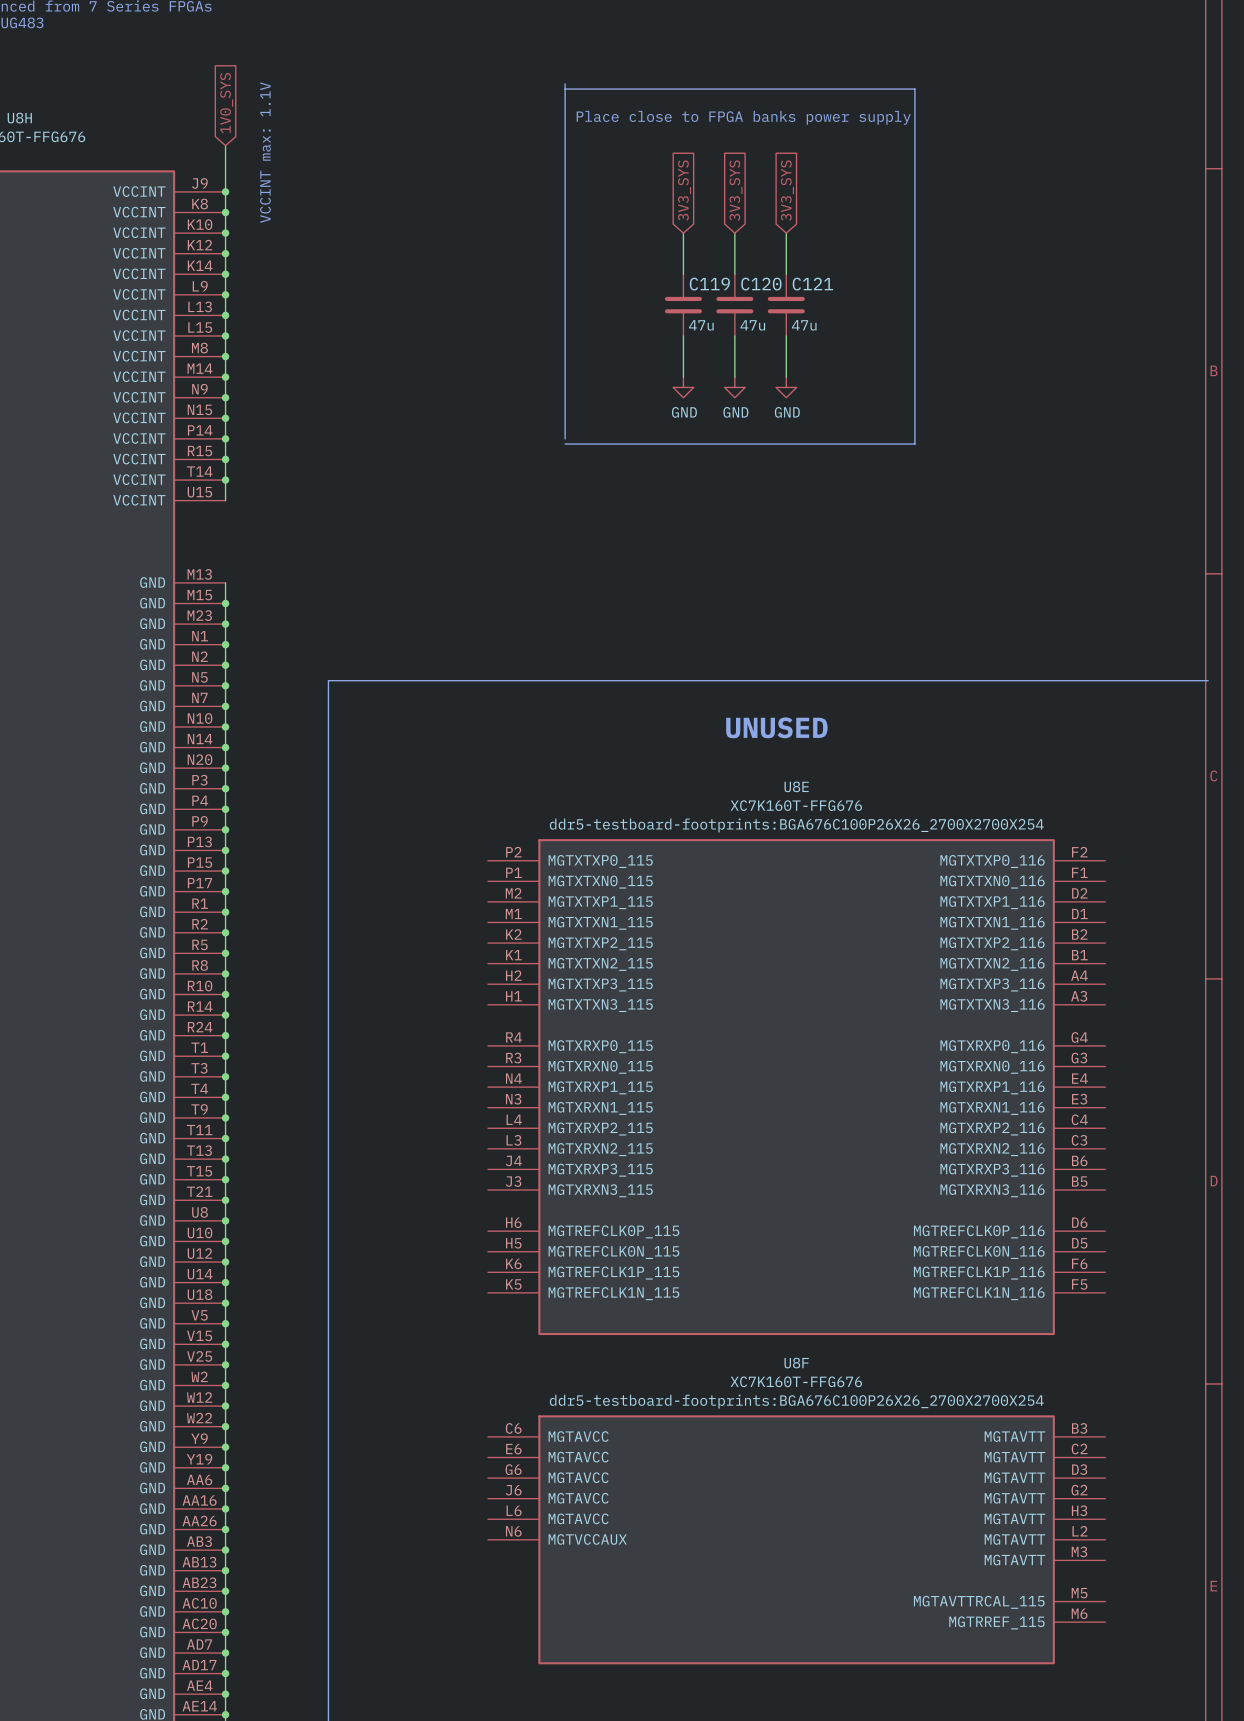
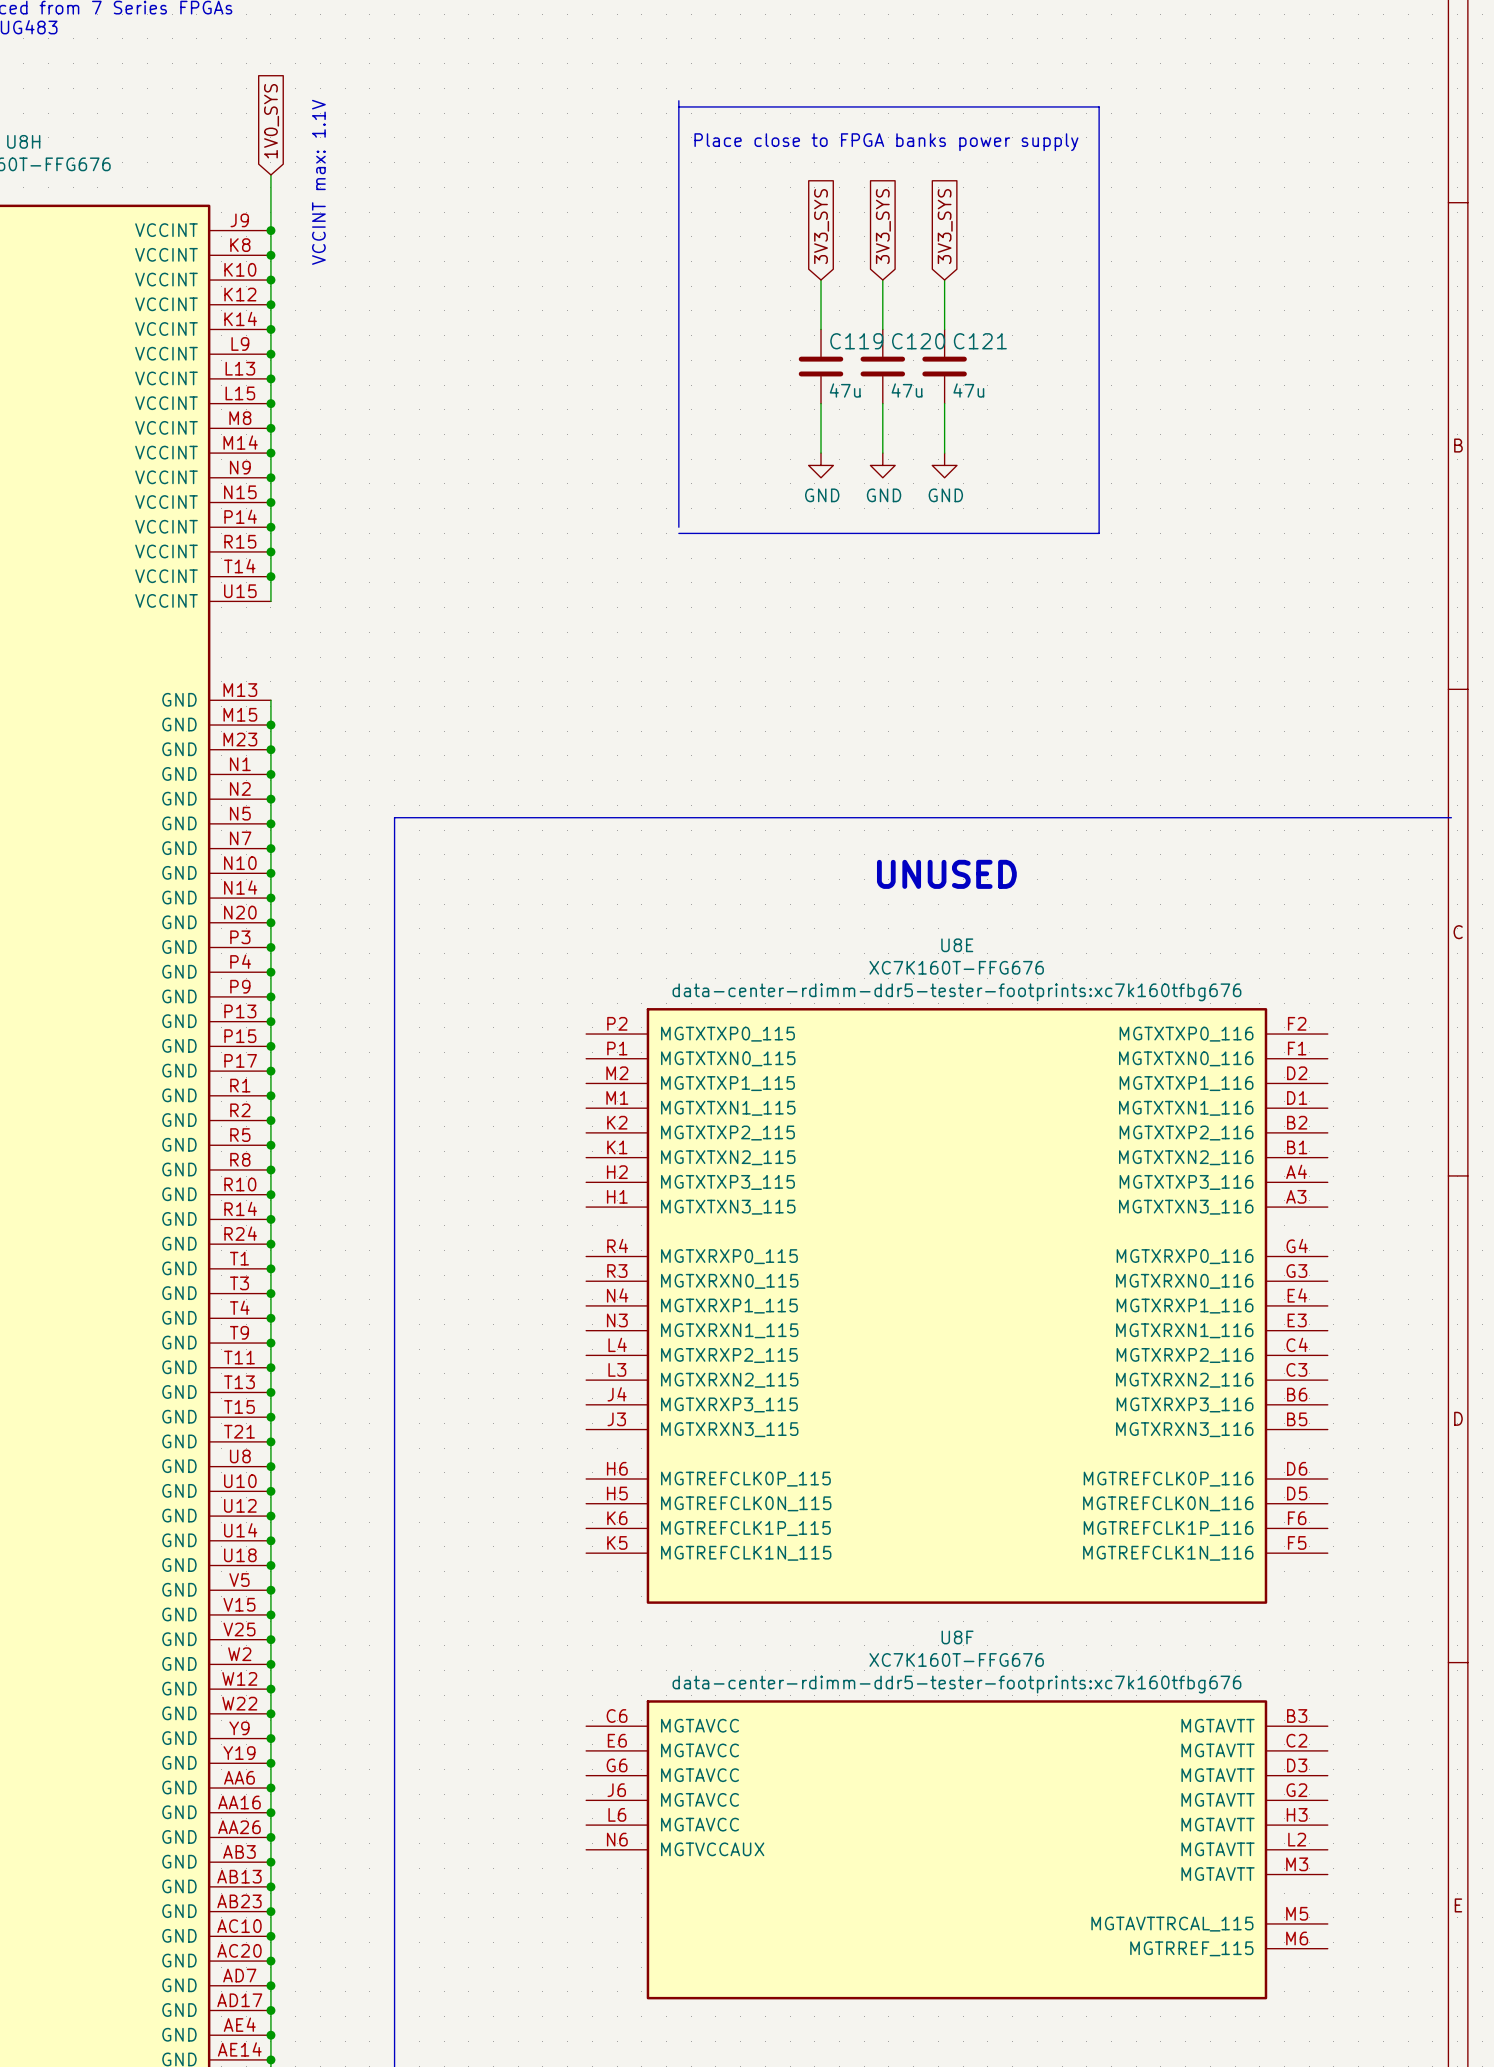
U8E text: ddr5-testboard-footprints:BGA676C100P26X26_2700X2700X254 (796, 825) -> data-center-rdimm-ddr5-tester-footprints:xc7k160tfbg676 (956, 992)
U8F text: ddr5-testboard-footprints:BGA676C100P26X26_2700X2700X254 (796, 1401) -> data-center-rdimm-ddr5-tester-footprints:xc7k160tfbg676 (956, 1684)

